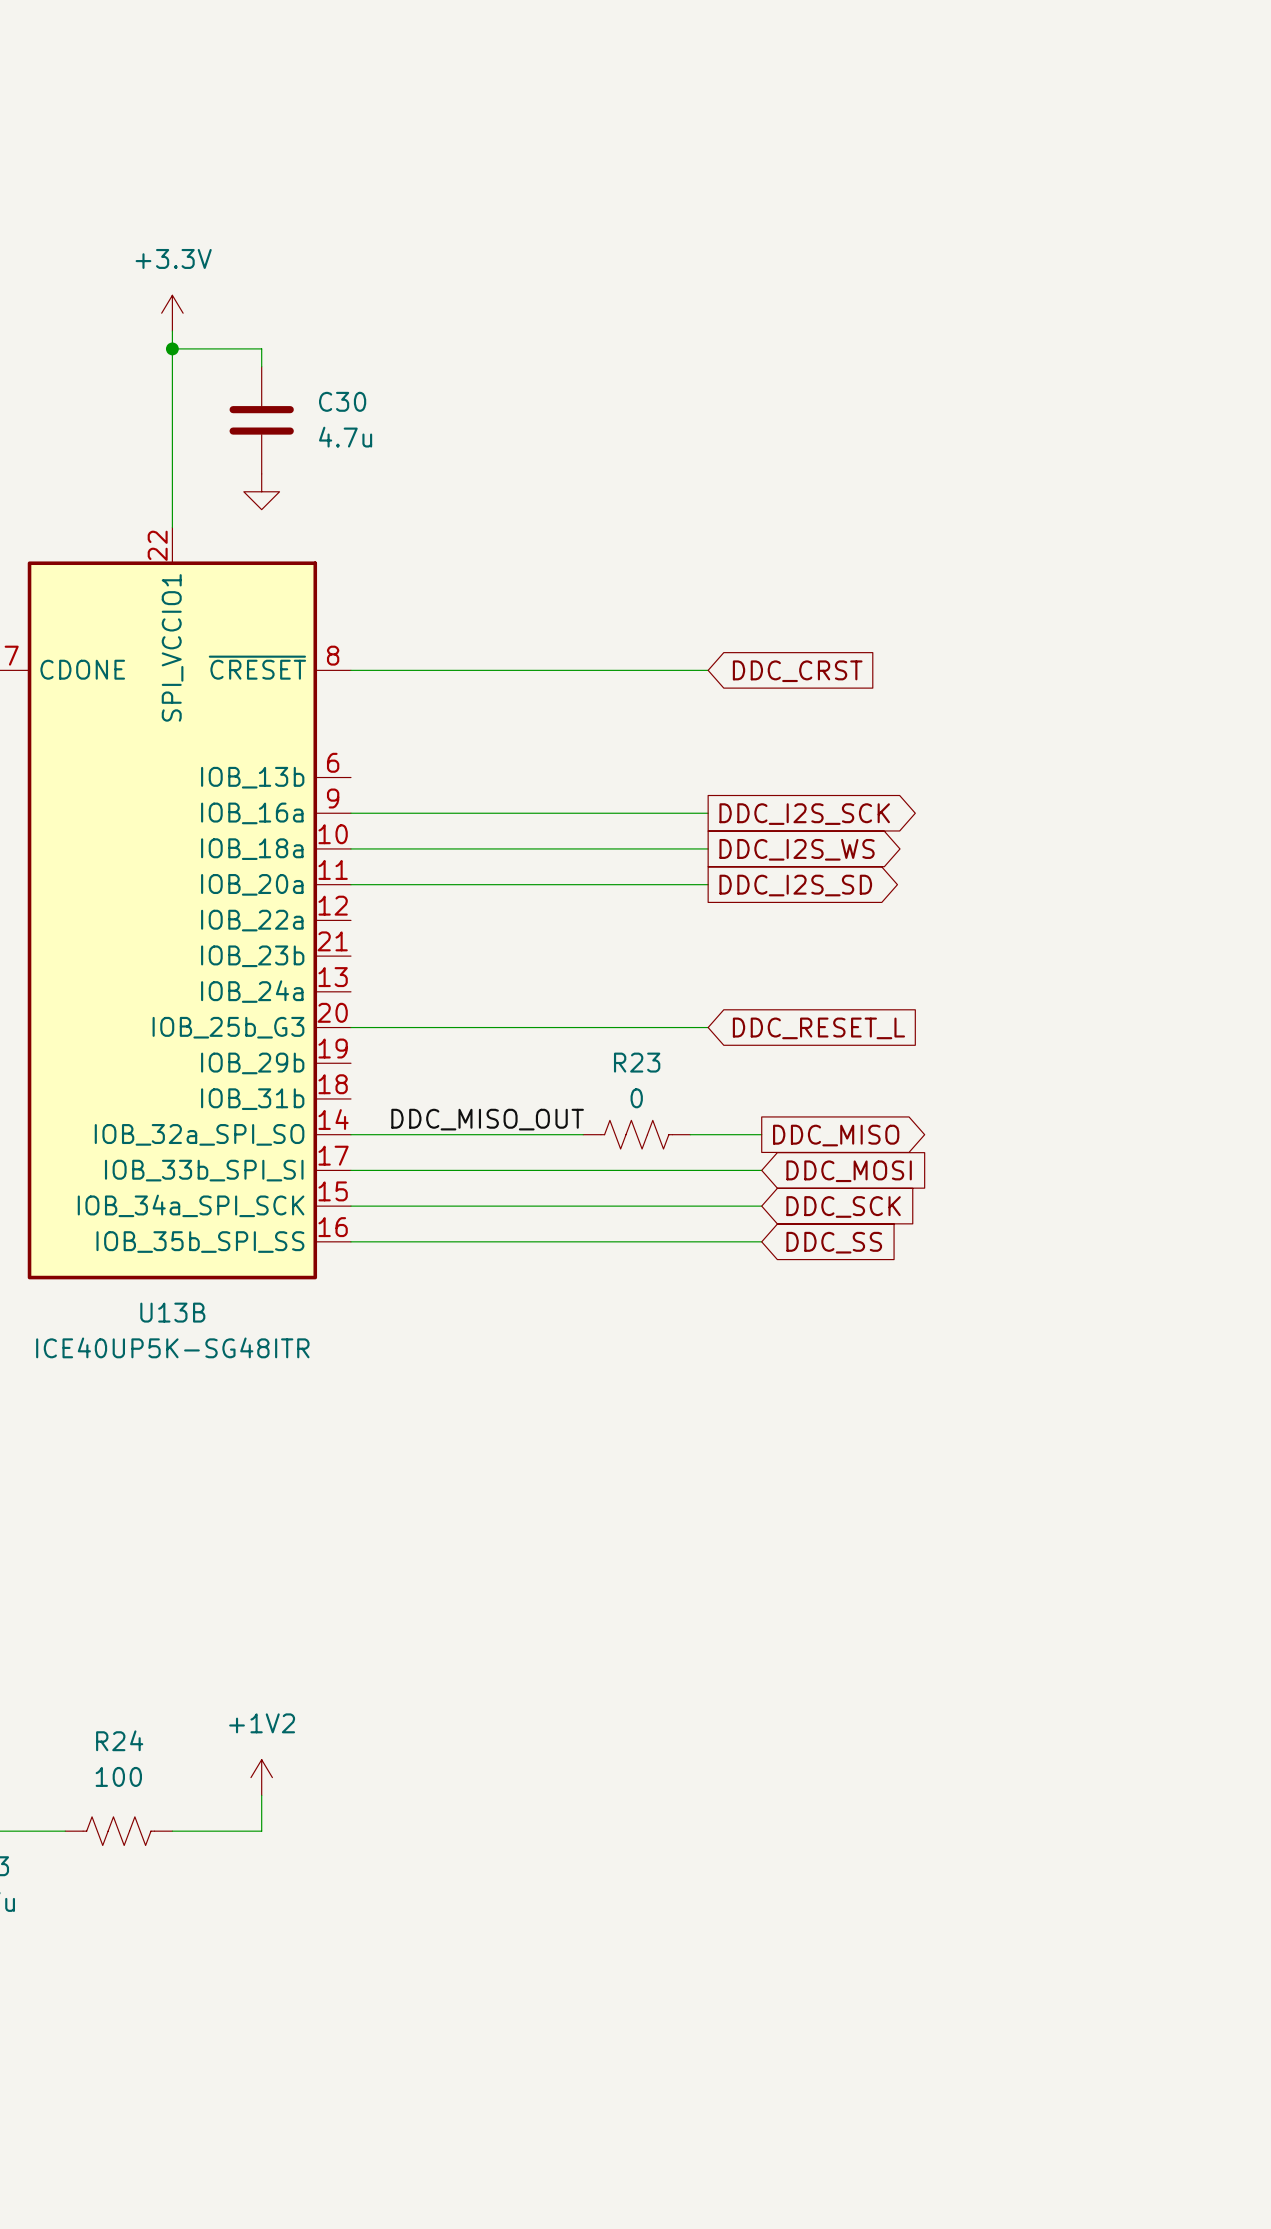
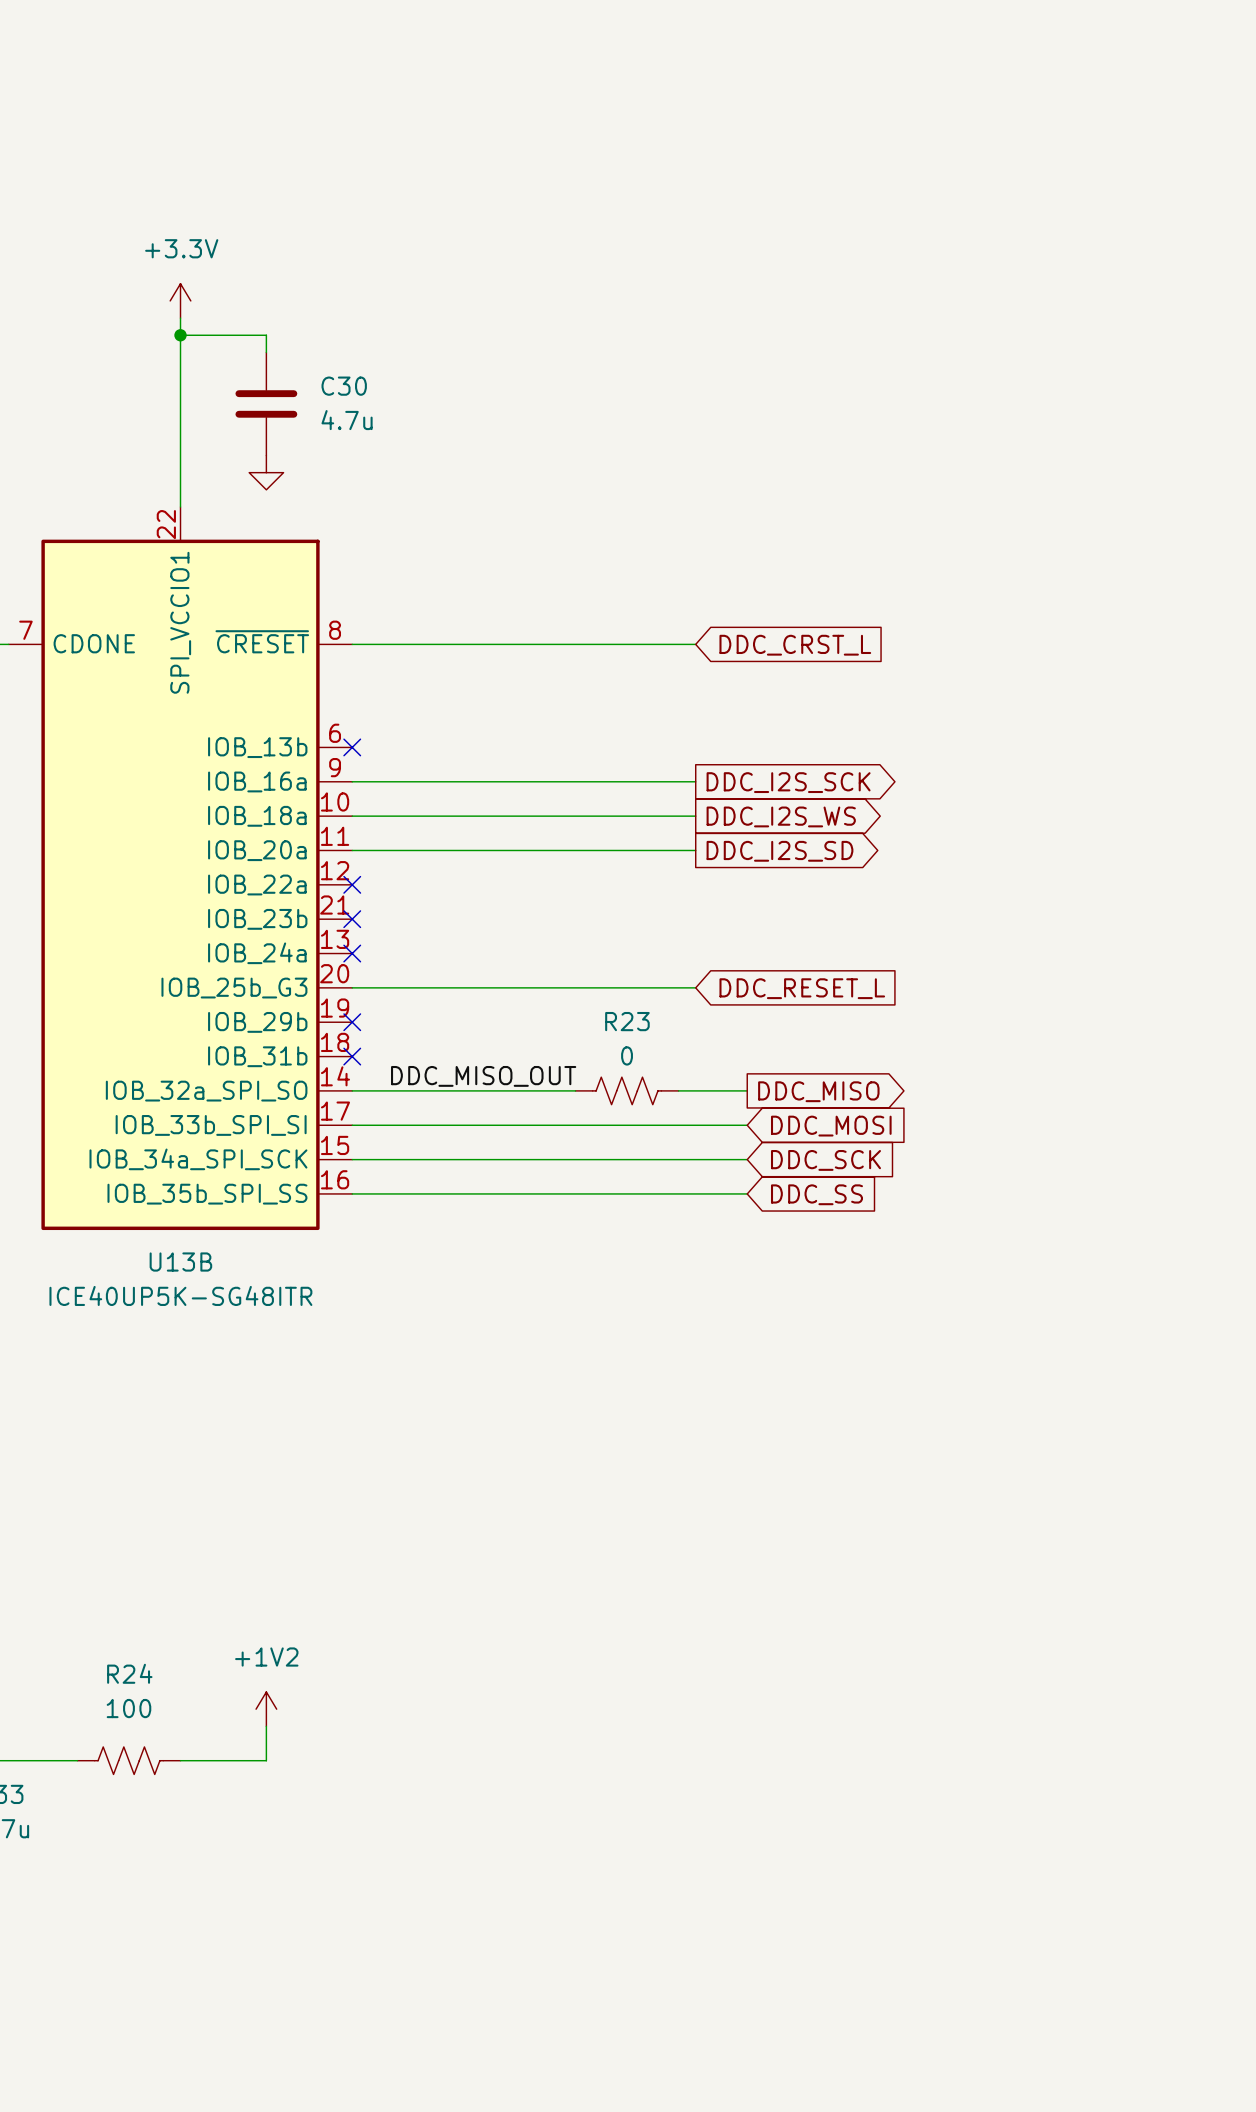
global label: DDC_CRST (797, 671) -> DDC_CRST_L (795, 645)
no-connect mark: none -> (352, 747)
no-connect mark: none -> (352, 884)
no-connect mark: none -> (352, 919)
no-connect mark: none -> (352, 953)
no-connect mark: none -> (352, 1022)
no-connect mark: none -> (352, 1056)

